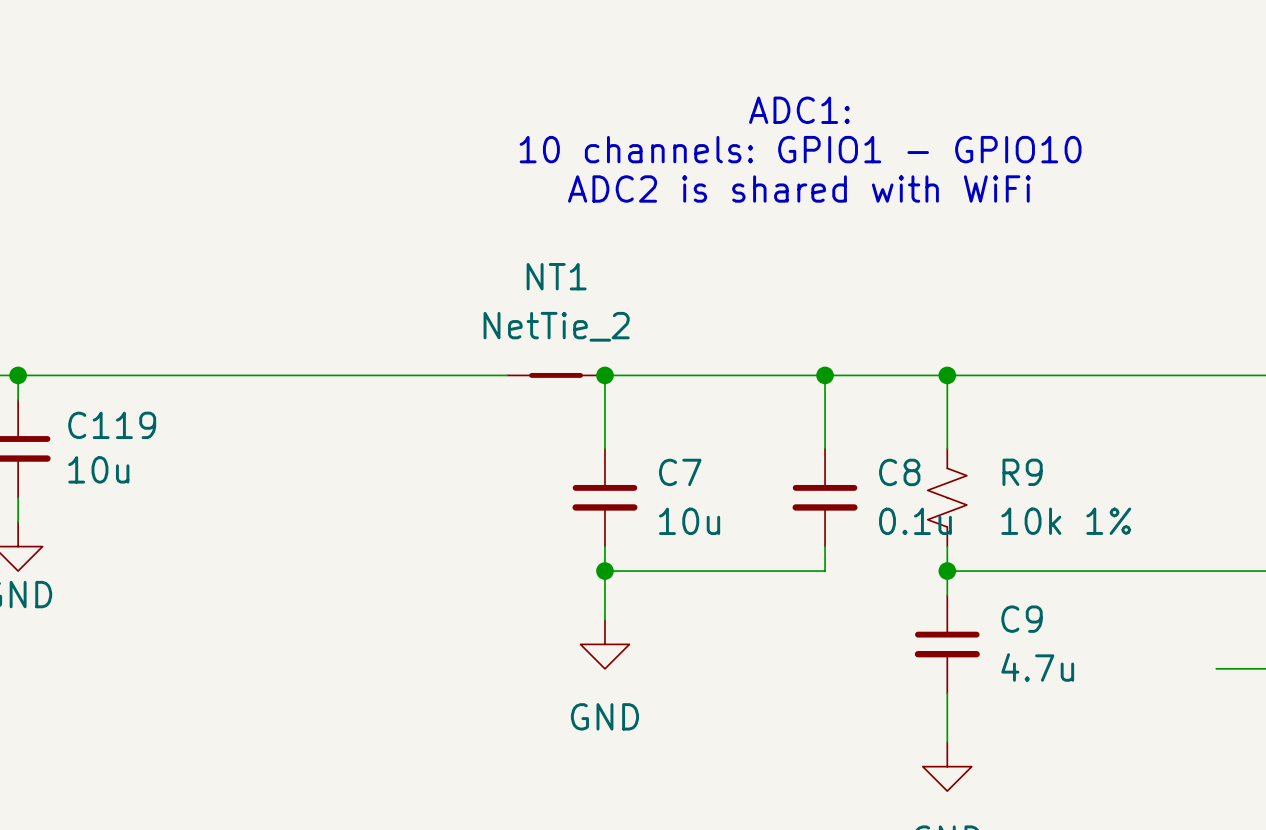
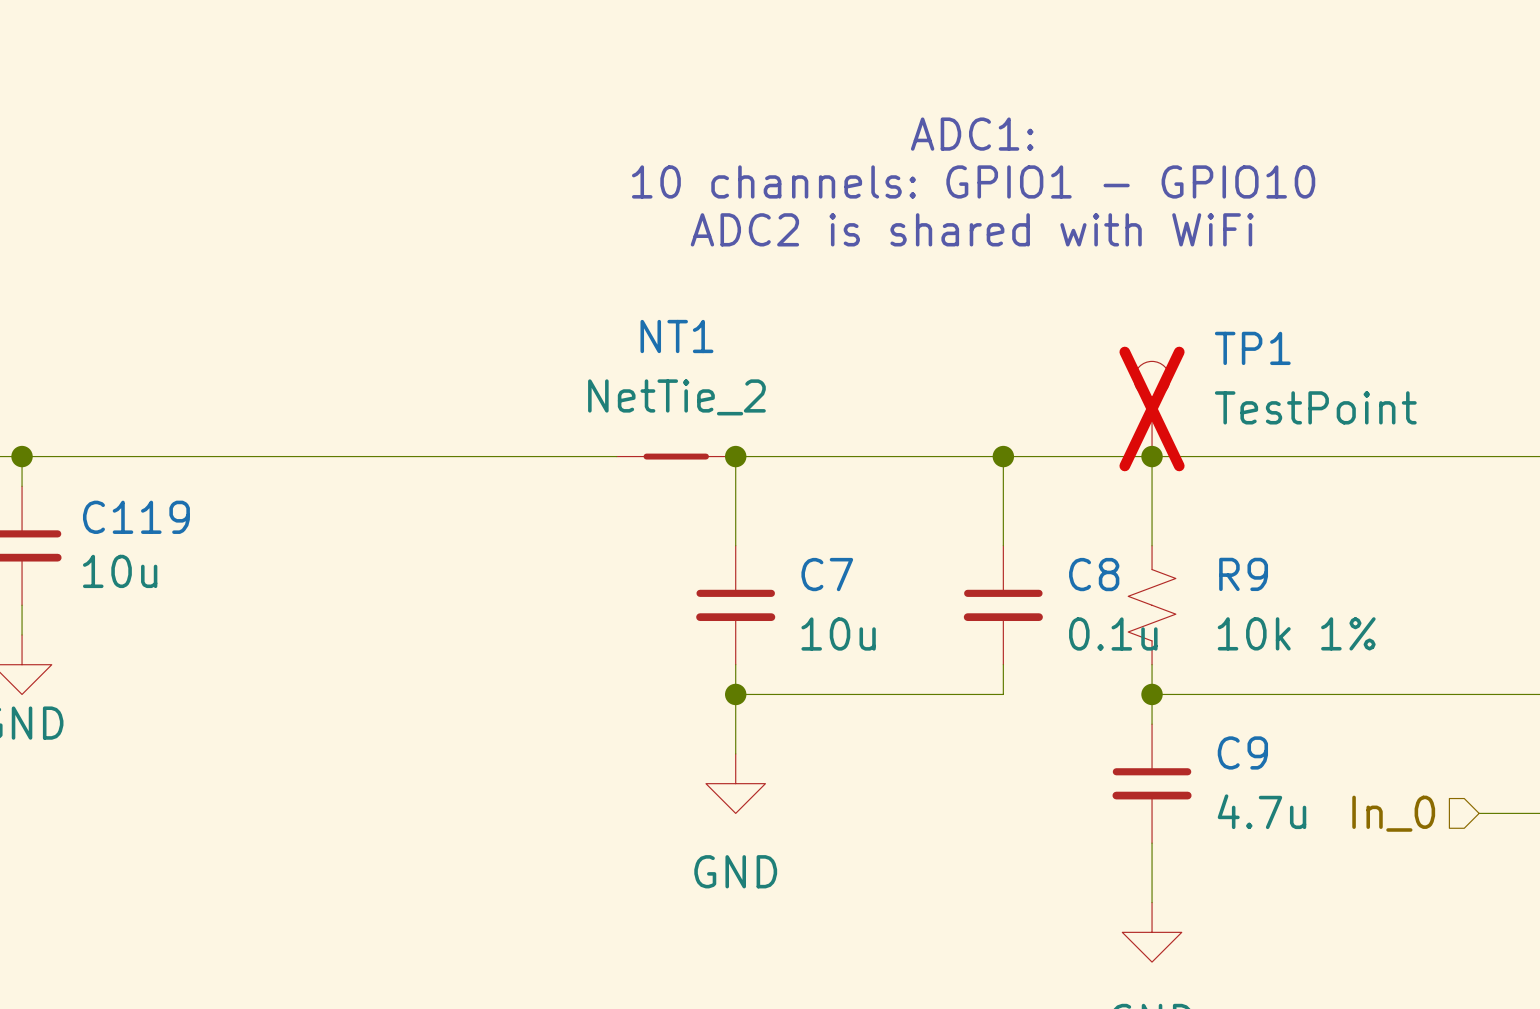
TP1: none -> TestPoint (1152, 408)
hierarchical label: none -> In_0 (1393, 813)

